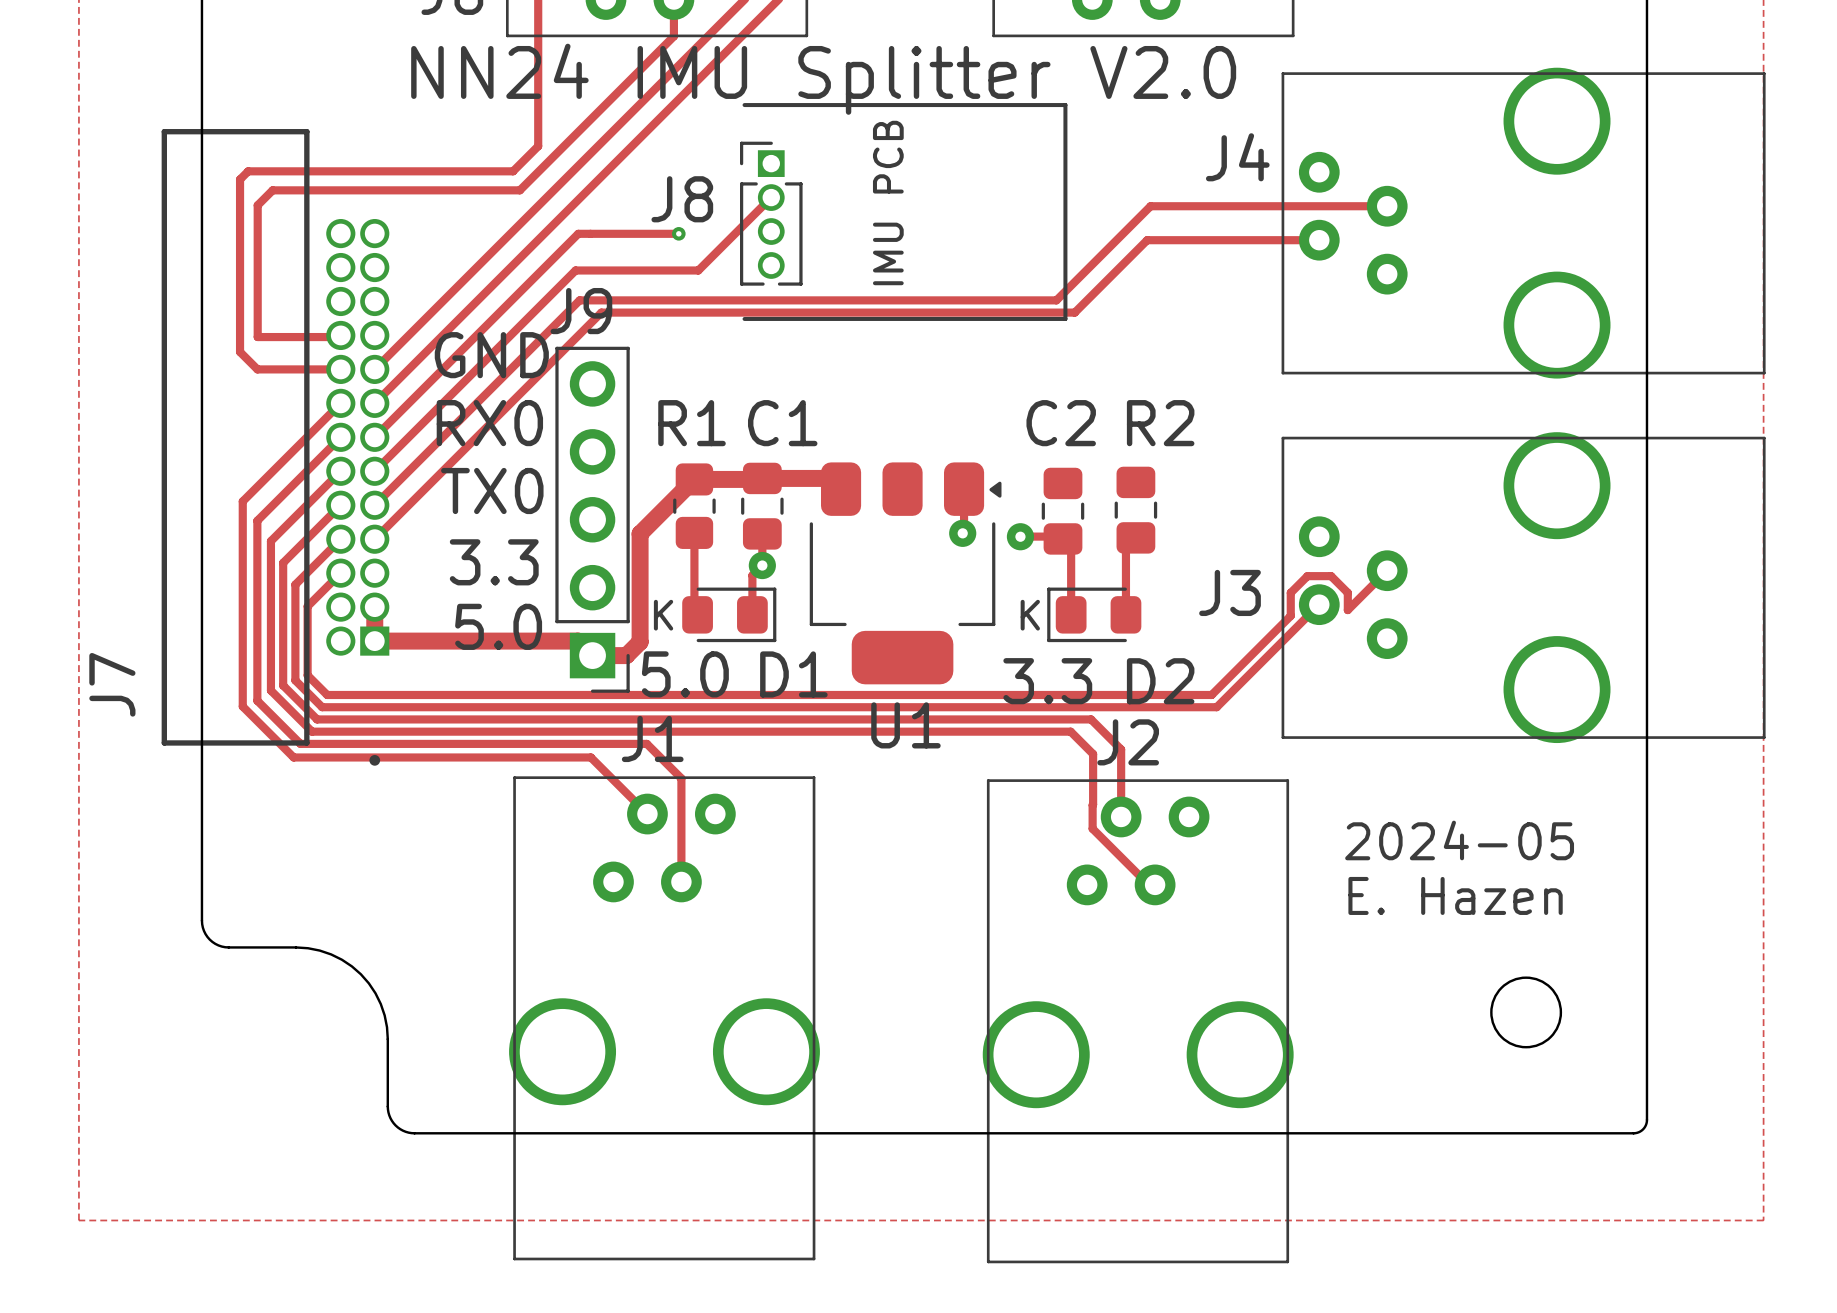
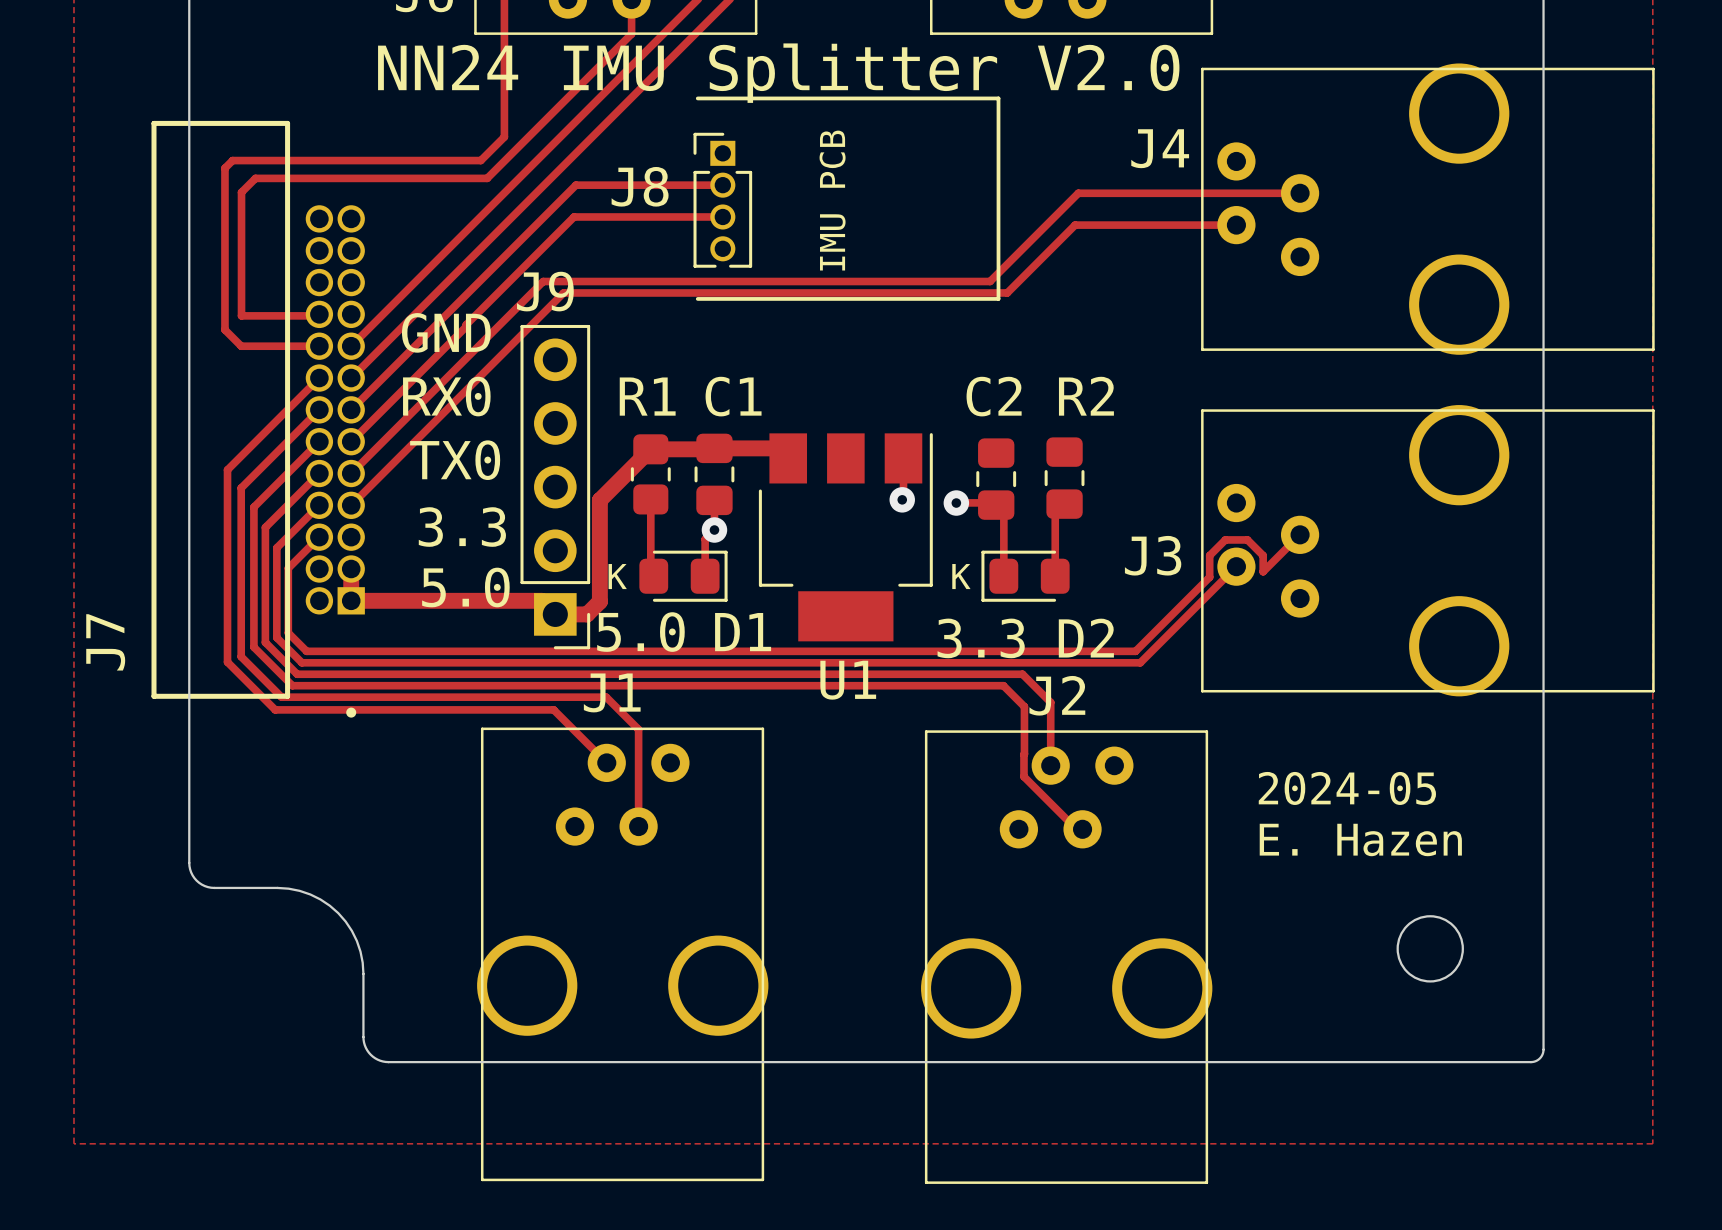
track: (771, 197) (698, 270) (575, 270) (497, 348) -> (722, 216) (574, 216) (466, 326)
track: (578, 233) (678, 233) -> (541, 219) (575, 185) (722, 185)
via: (678, 233) -> none
U1 footprint: [809, 462, 1002, 685] -> [758, 433, 933, 642]

